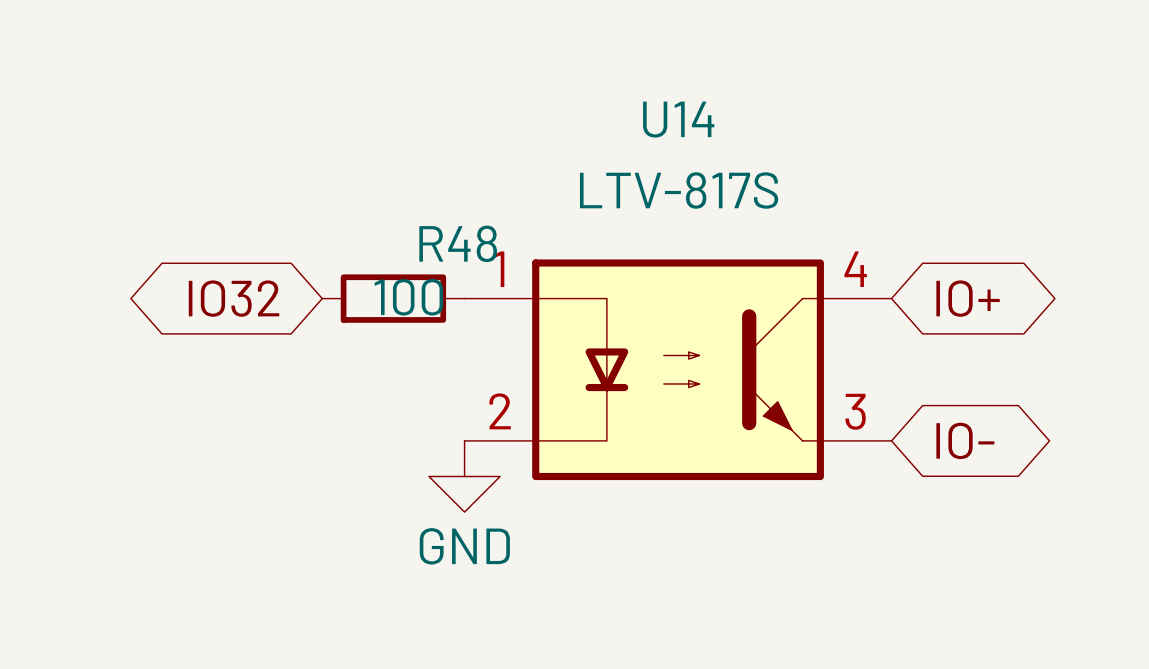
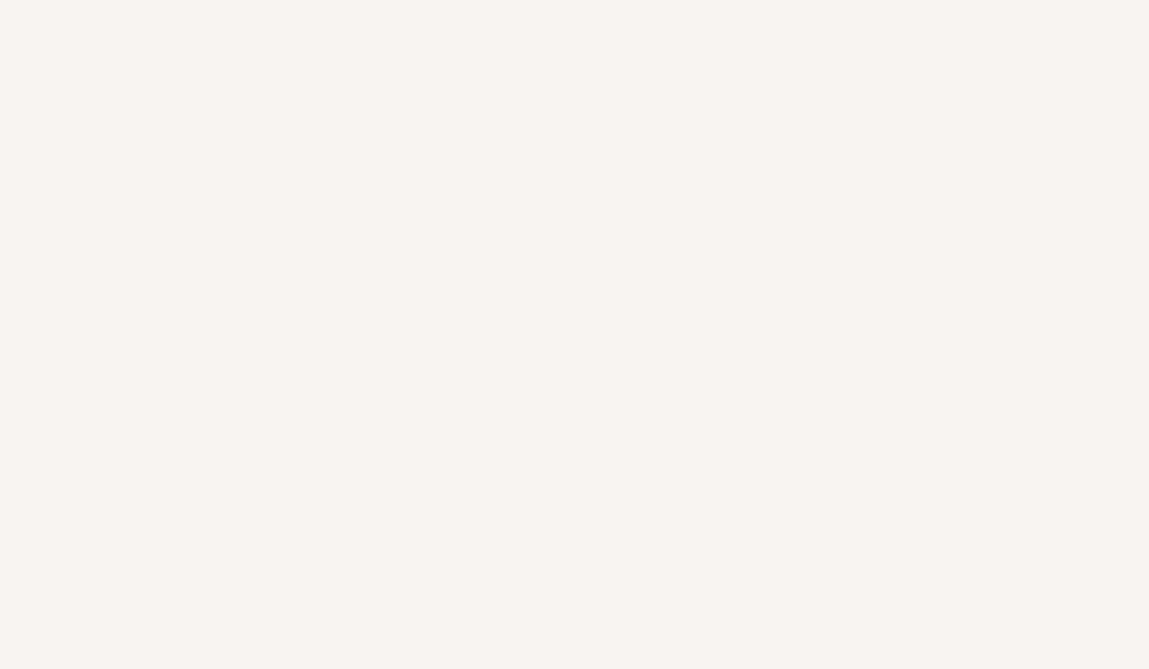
global label: IO32 (234, 298) -> none
R48: 100 (393, 298) -> none
global label: IO+ (968, 298) -> none
U14: LTV-817S (678, 369) -> none
global label: IO- (965, 440) -> none
power symbol: GND (464, 476) -> none

